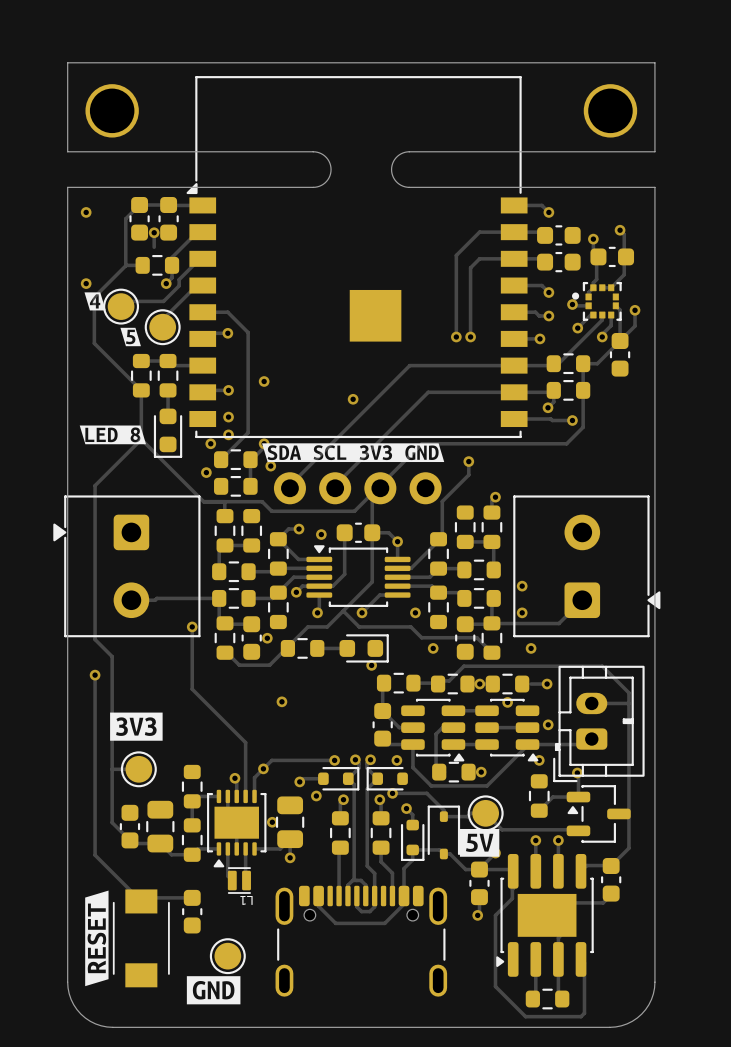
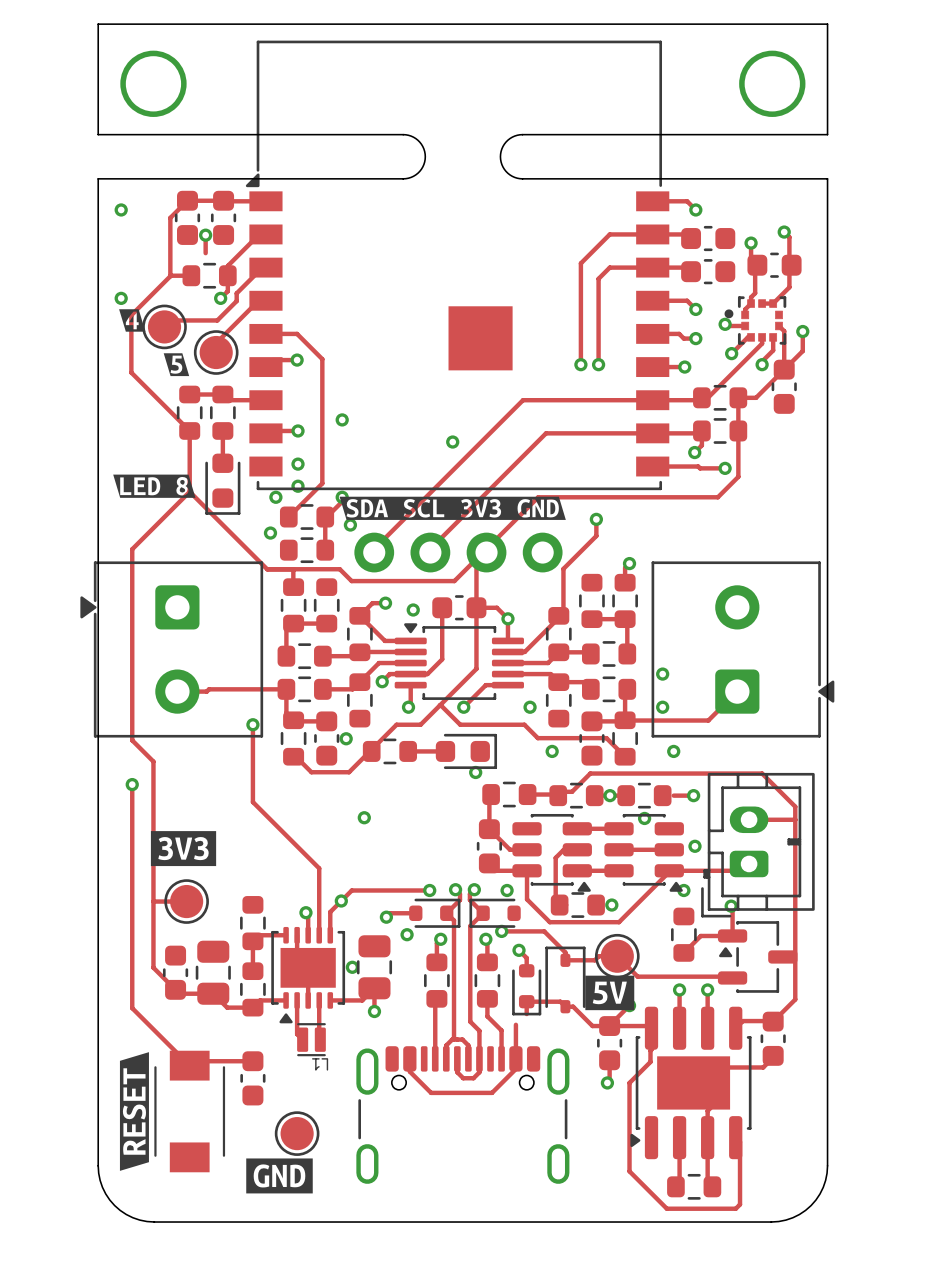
track: (412, 859) (404, 868) -> none

